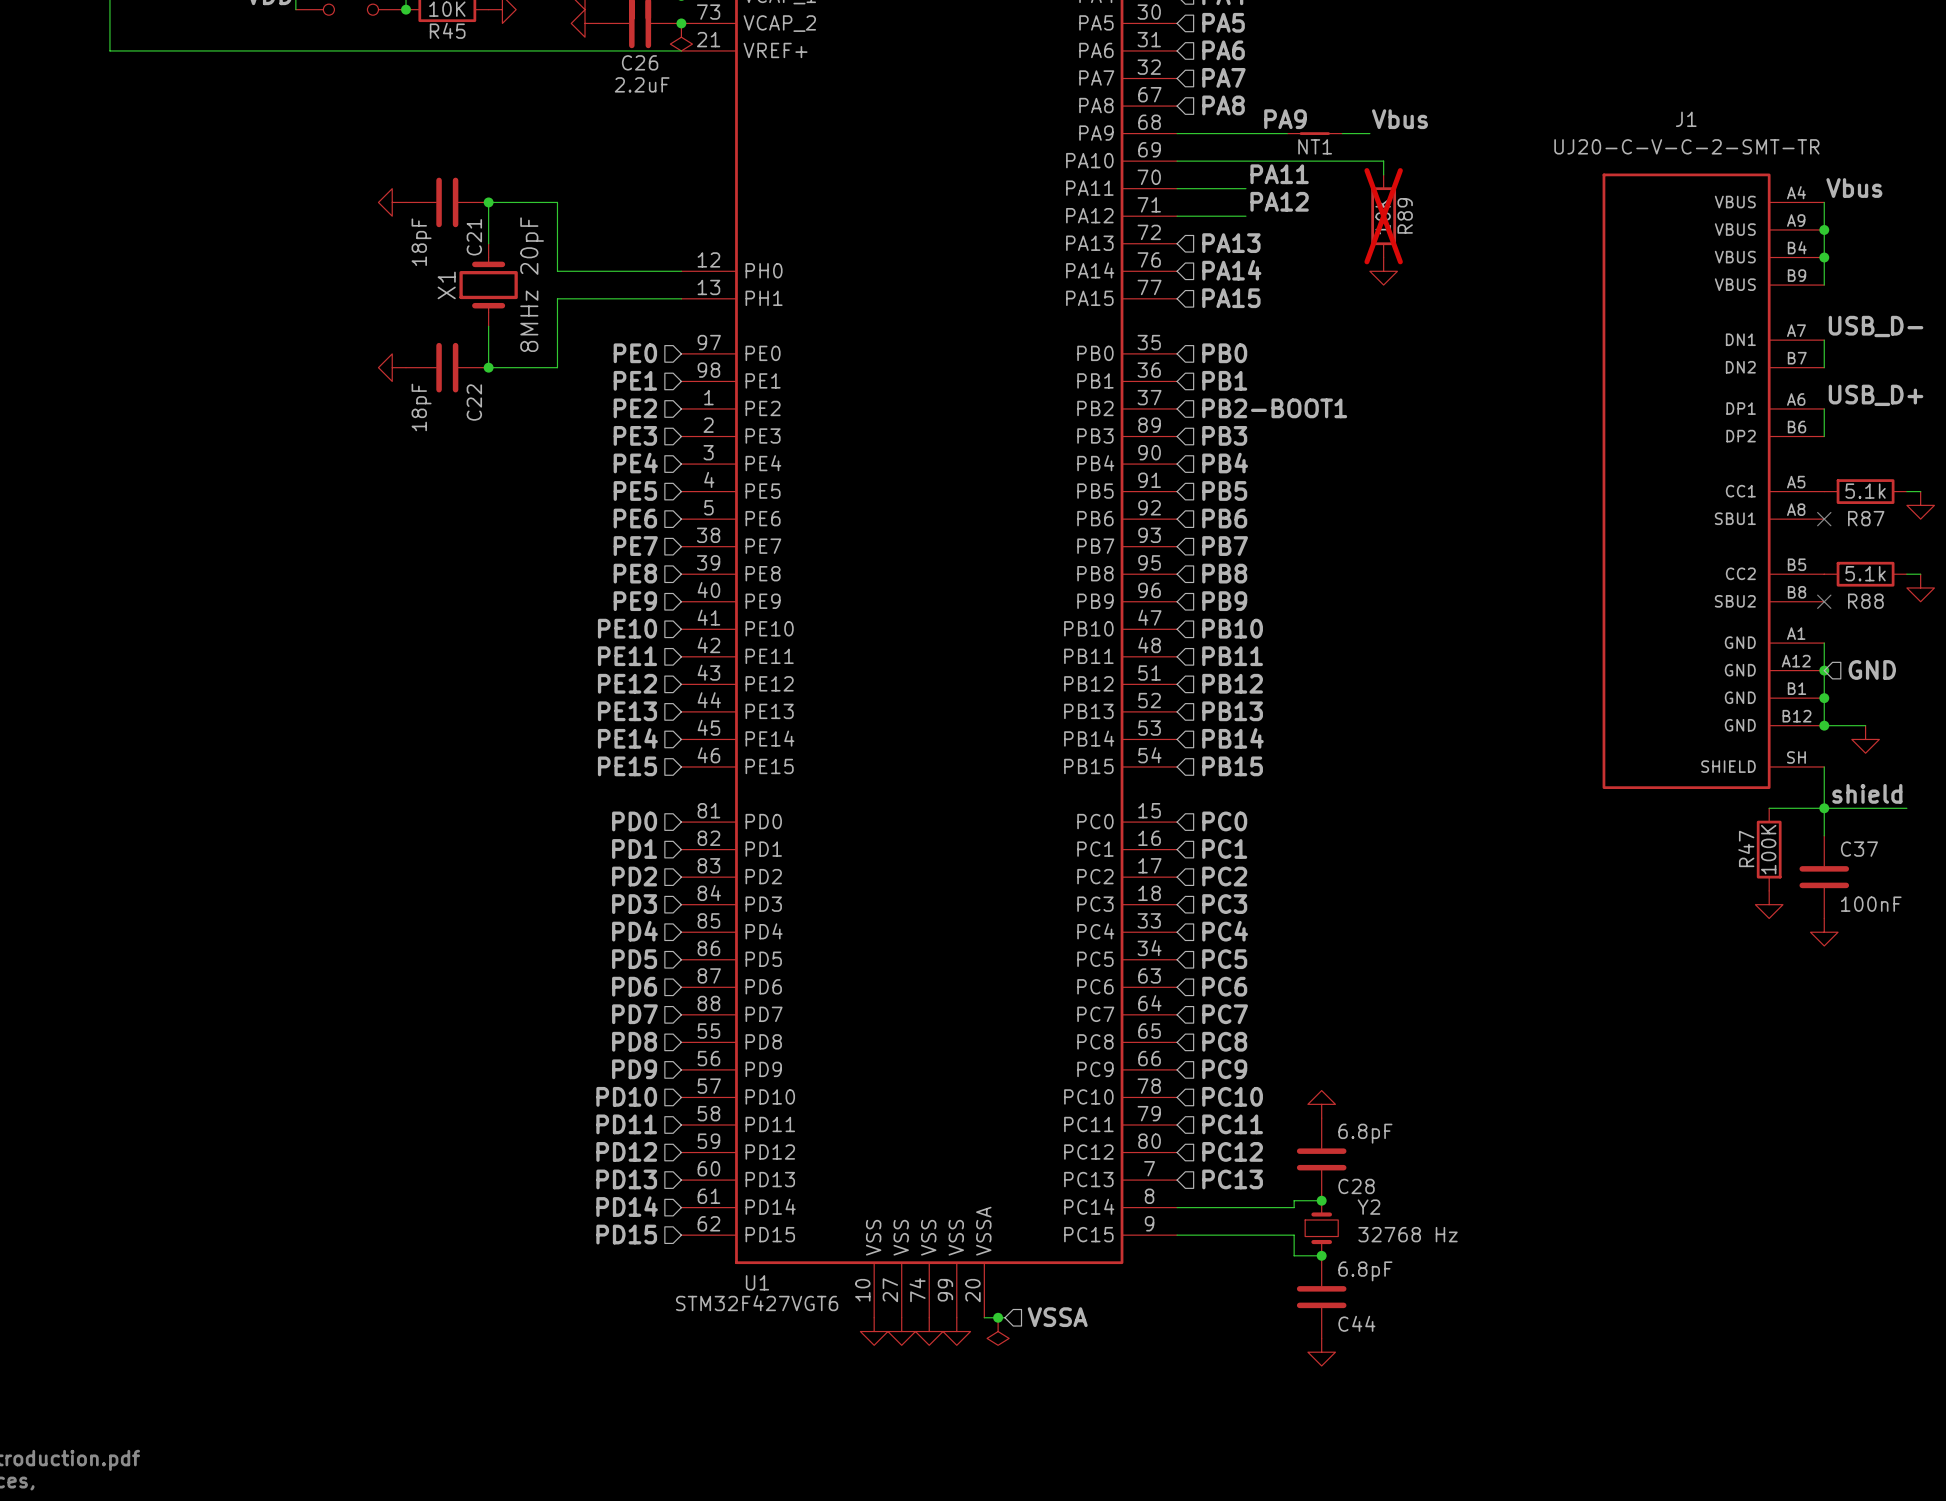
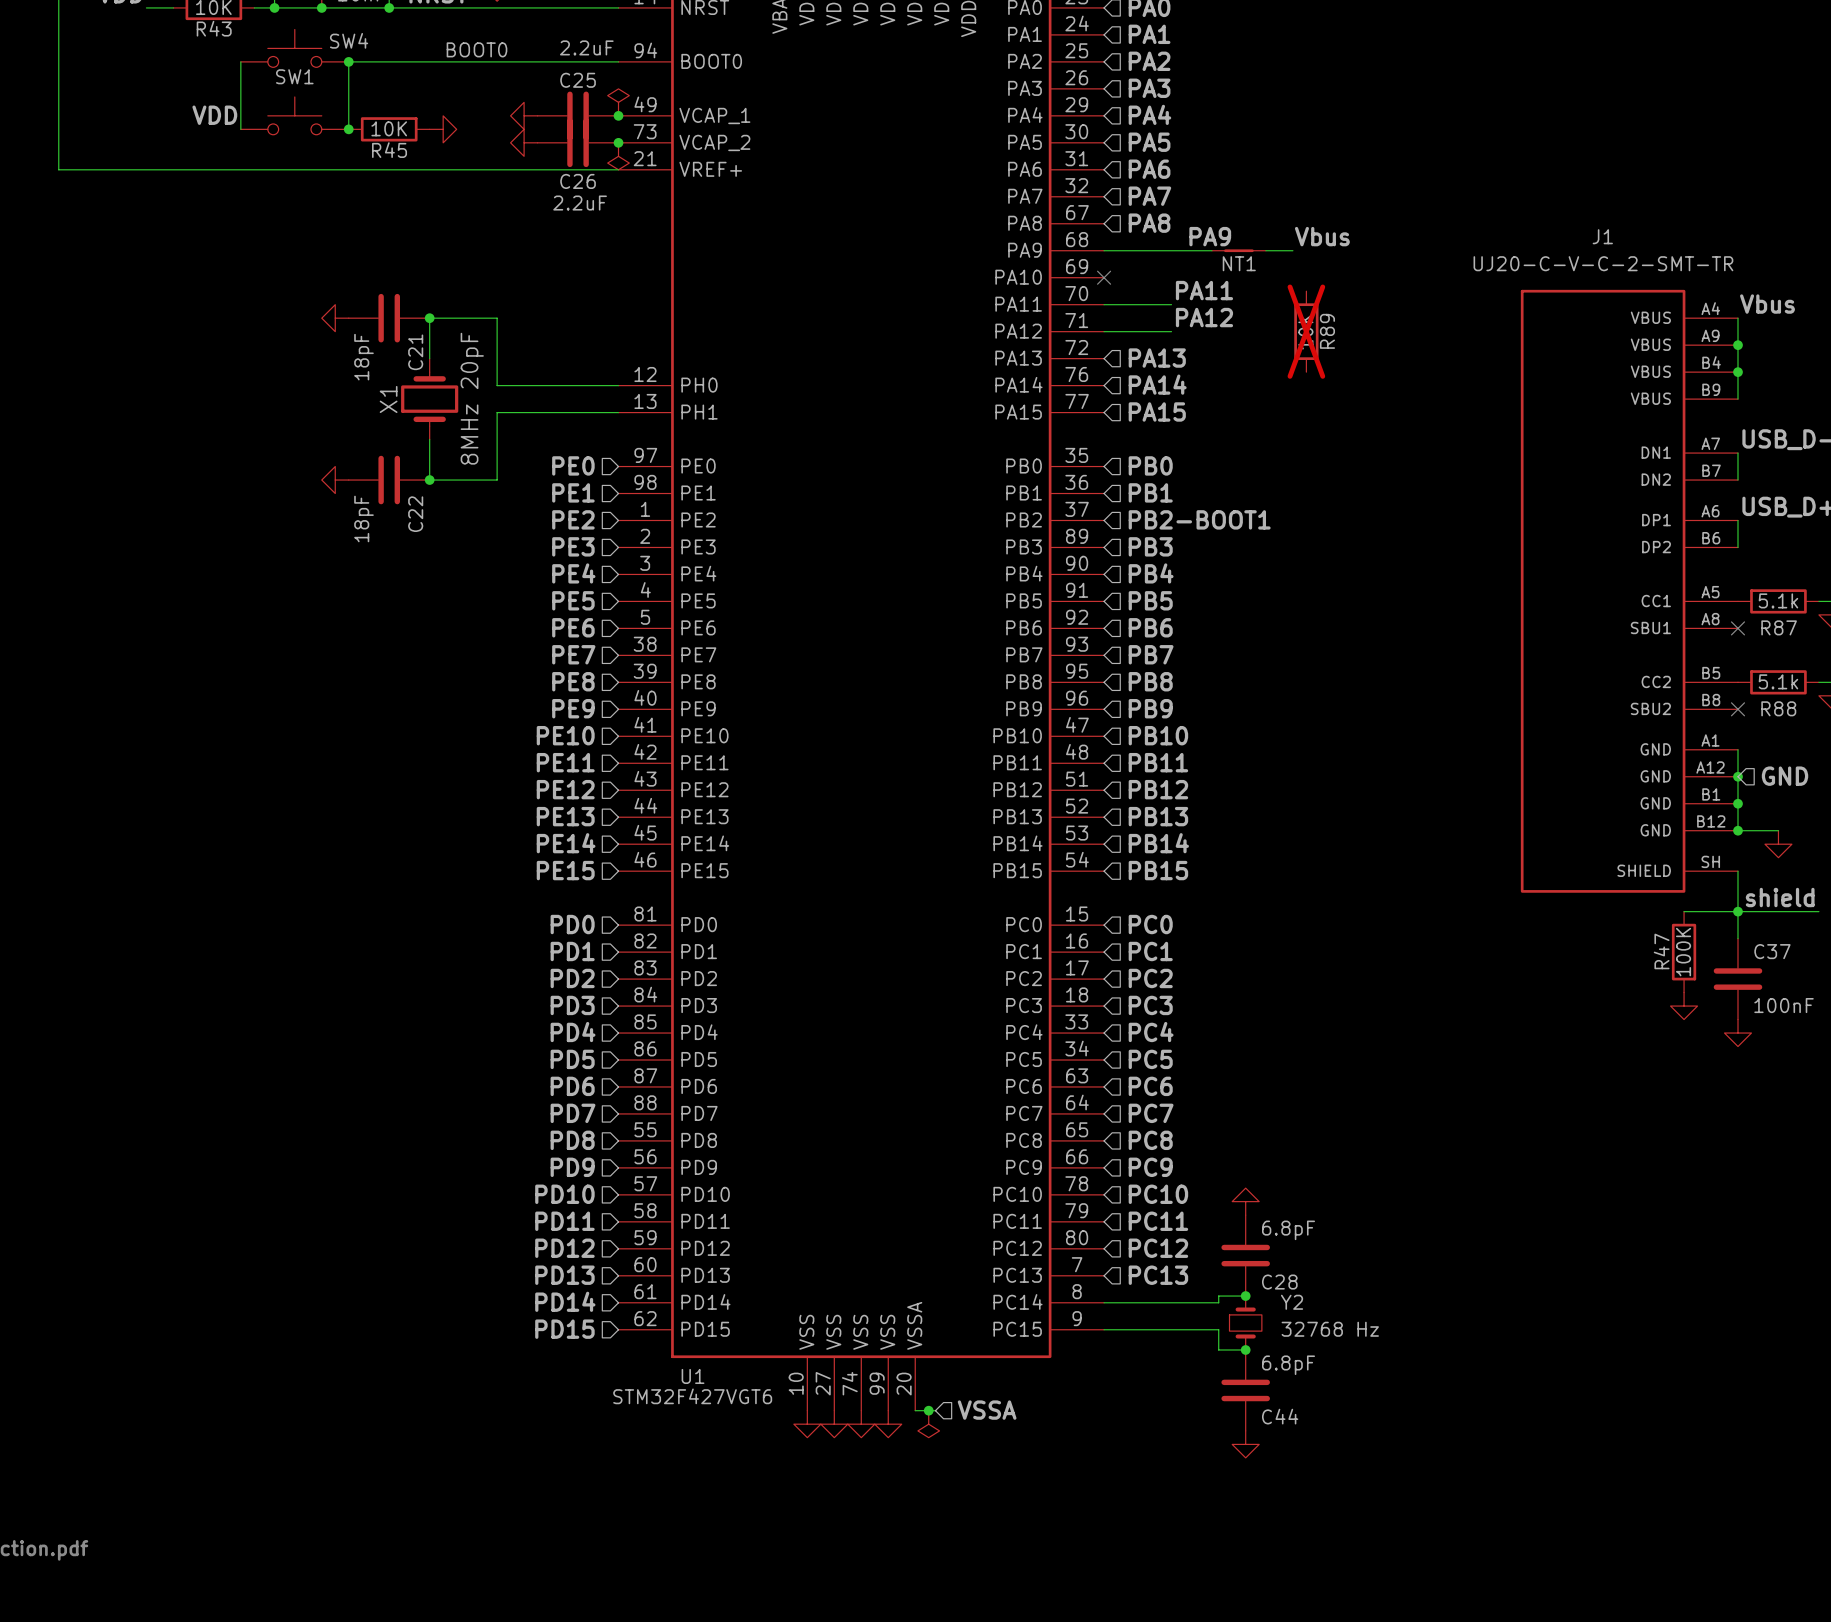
wire: (1177, 161) (1383, 161) (1383, 174) -> none
no-connect mark: none -> (1104, 277)
power symbol: (1383, 271) -> none

